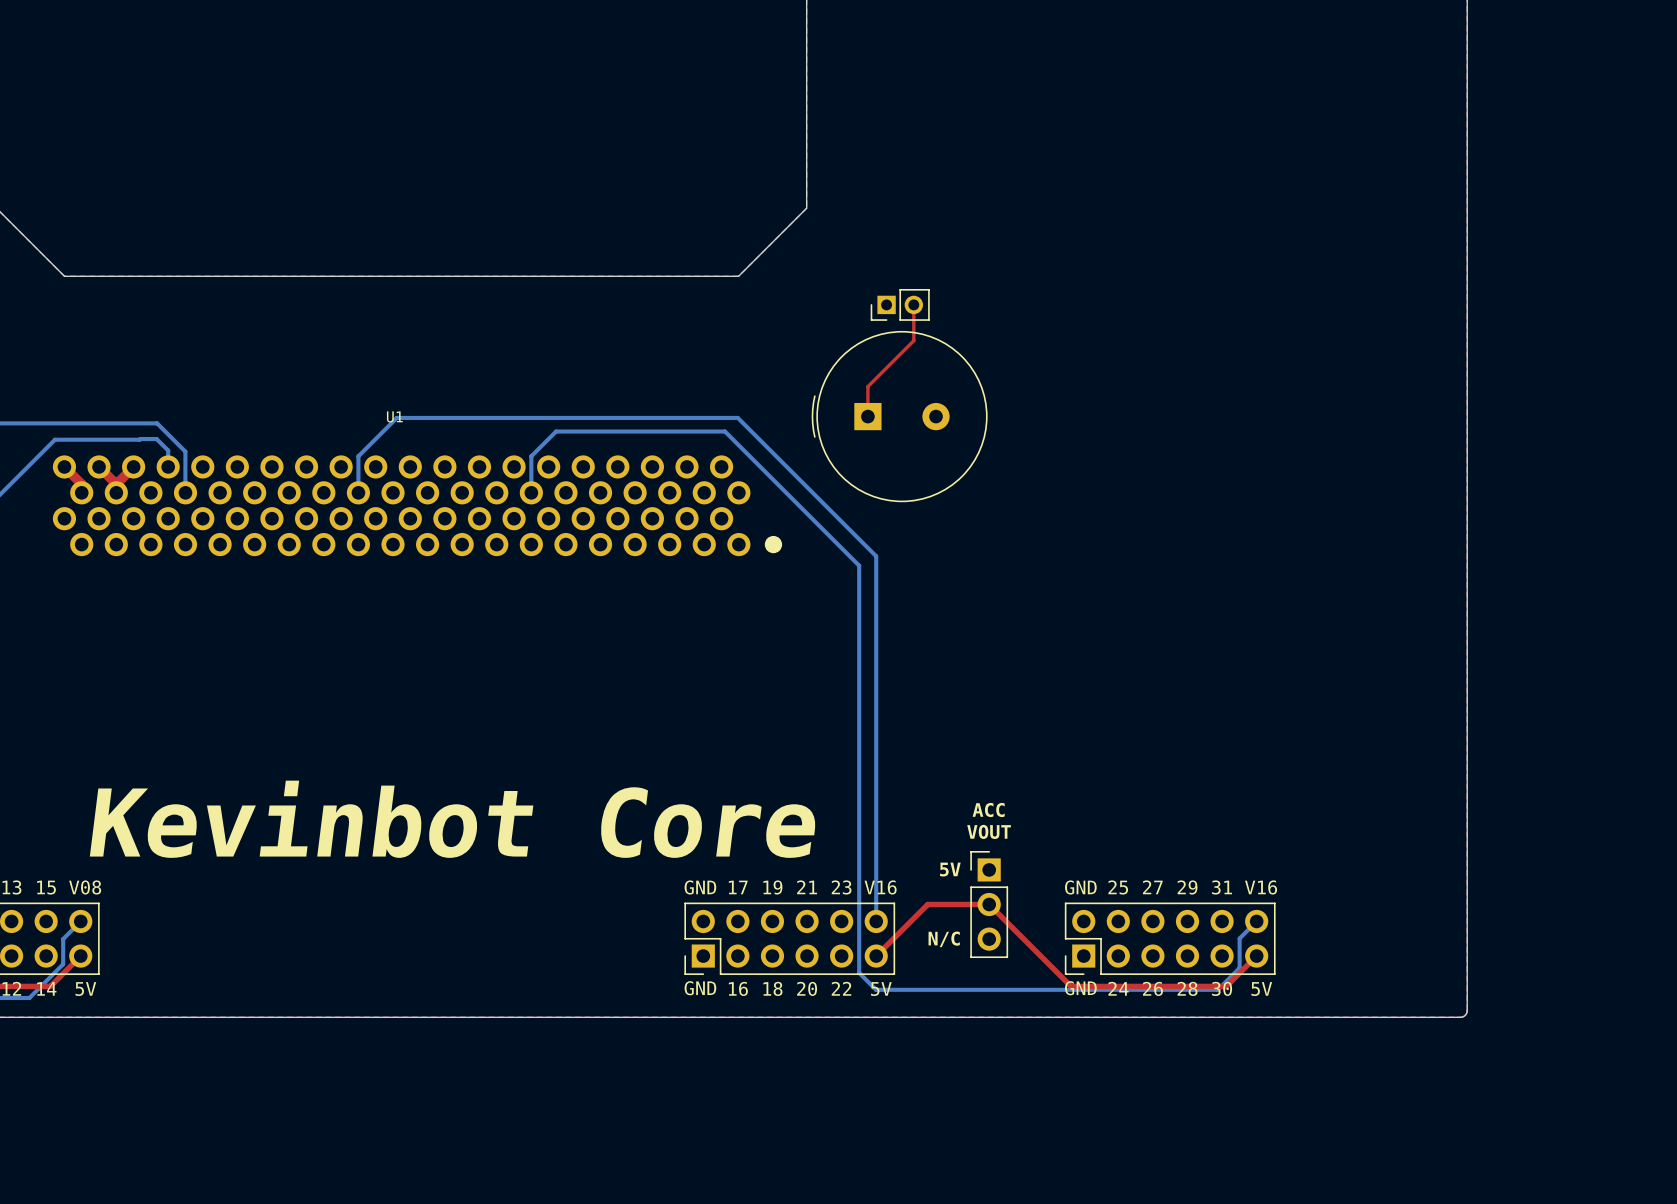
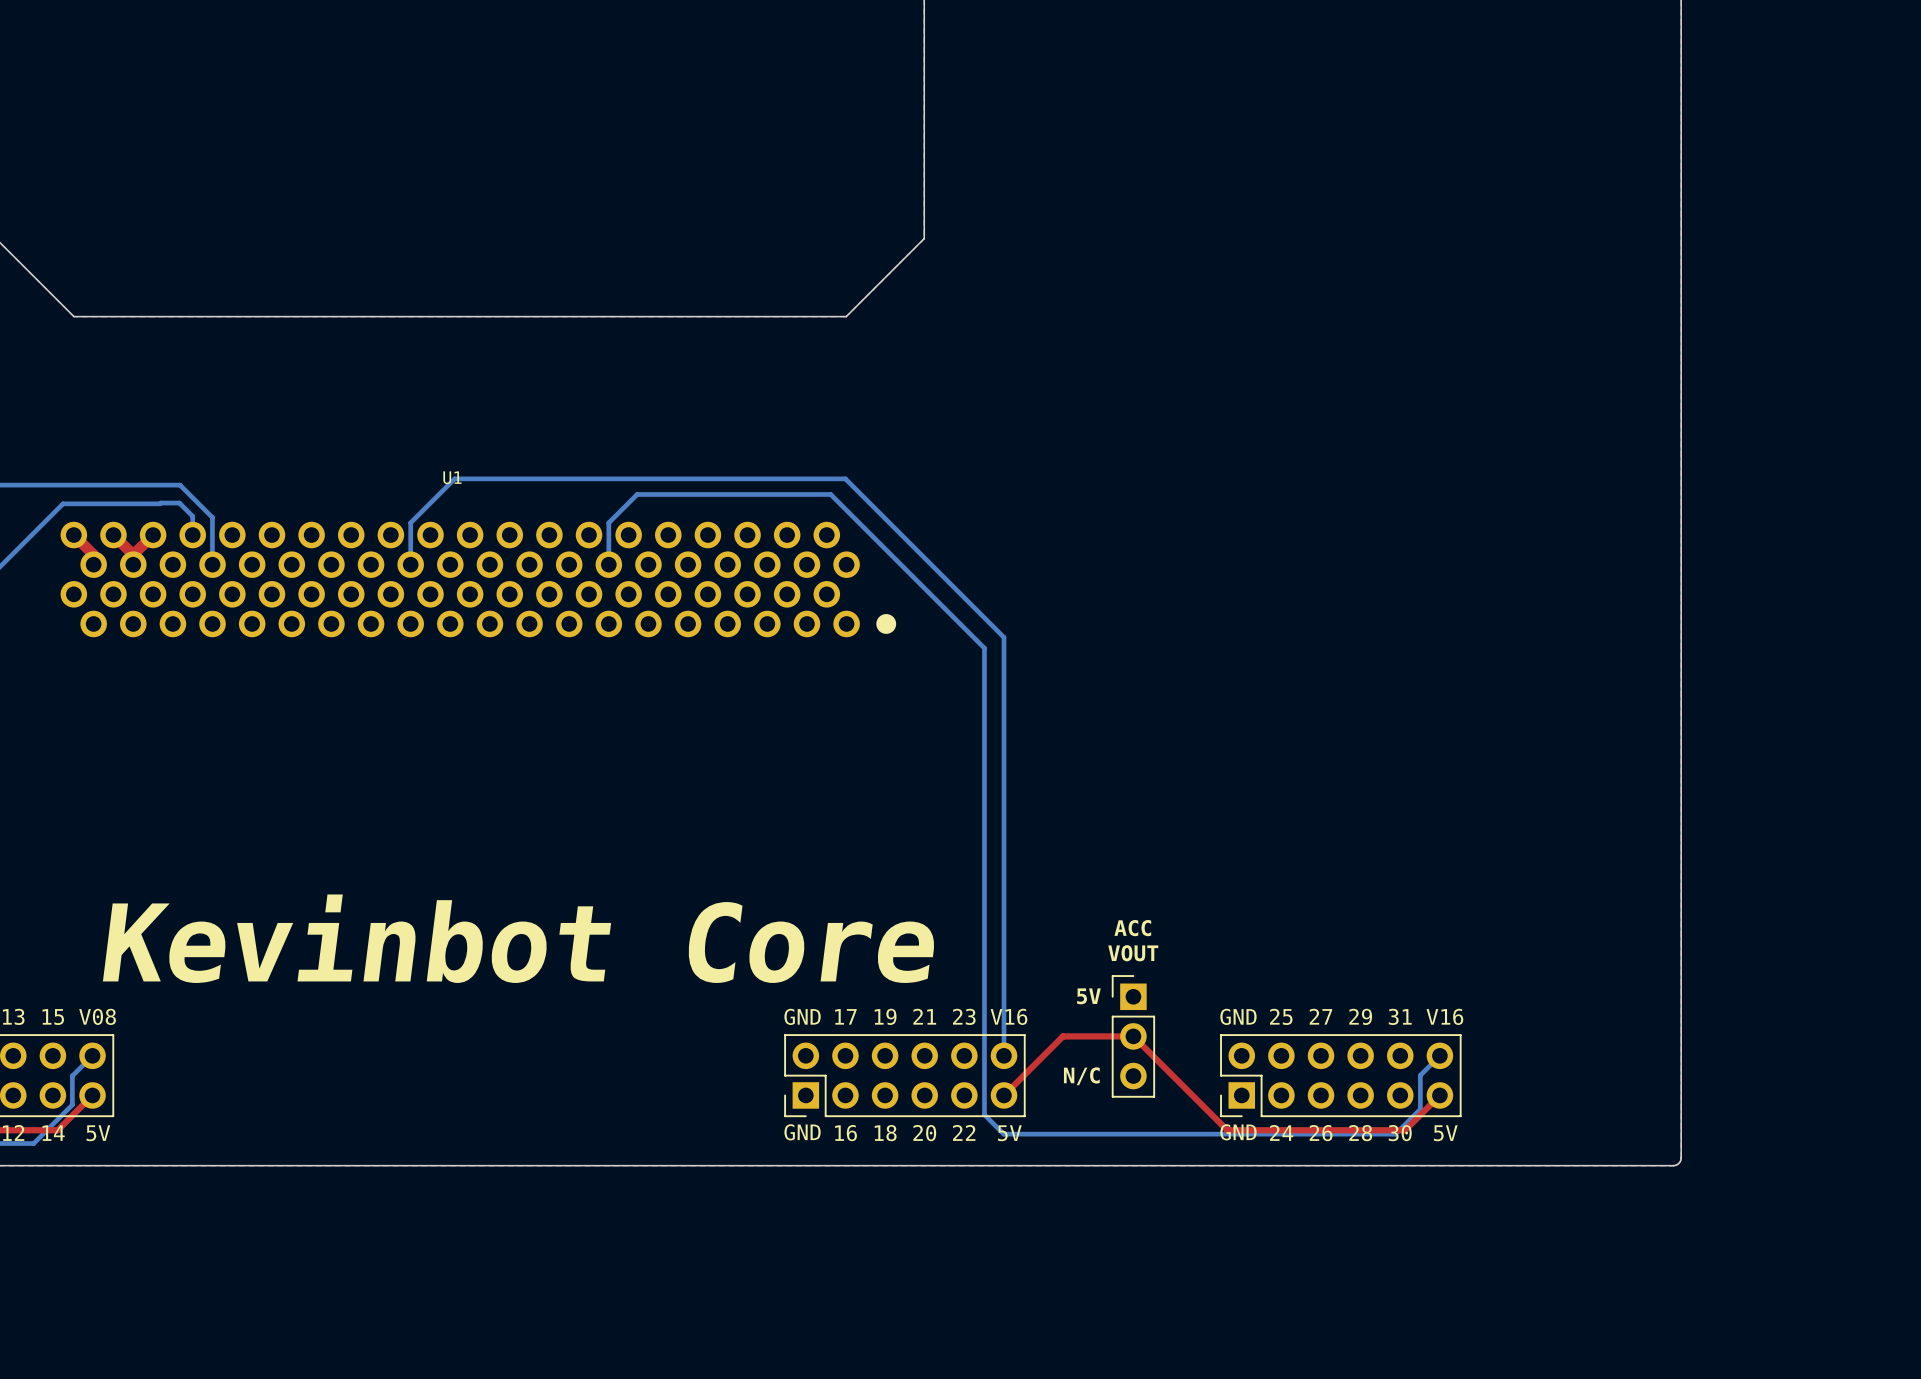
part: (900, 304) -> none
top track: (913, 304) (913, 340) (867, 386) (867, 416) -> none
part: (899, 416) -> none

